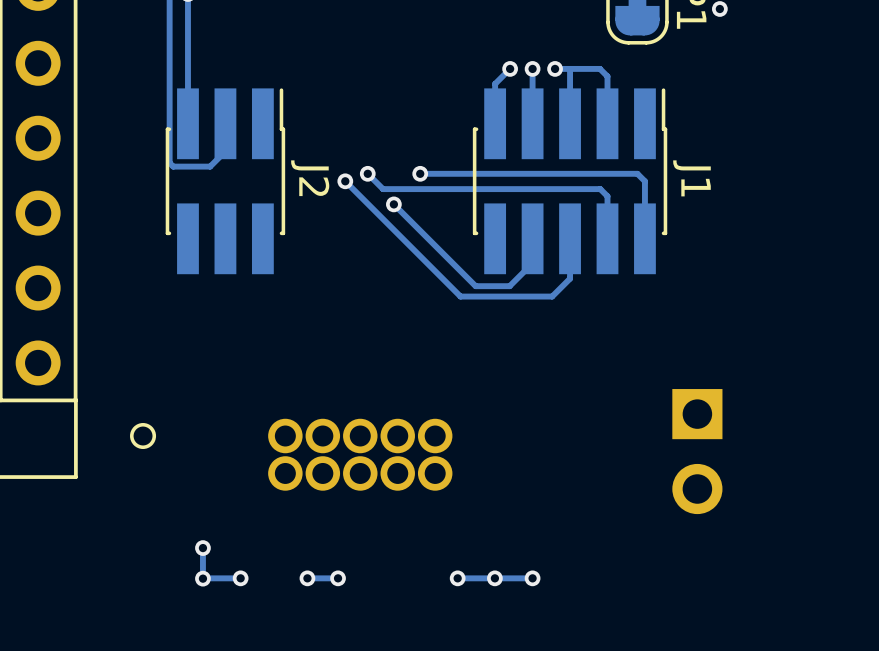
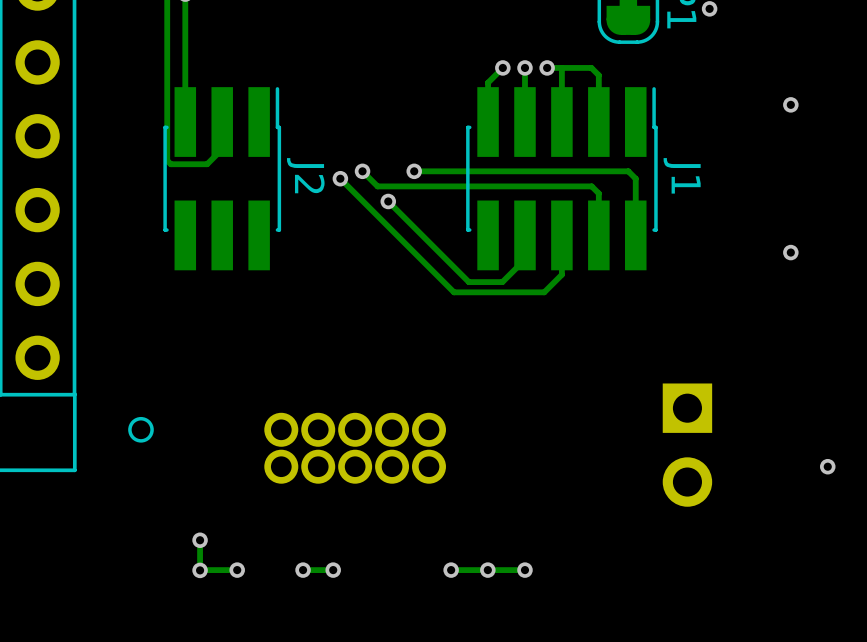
via: none -> (790, 104)
via: none -> (790, 252)
via: none -> (827, 466)

